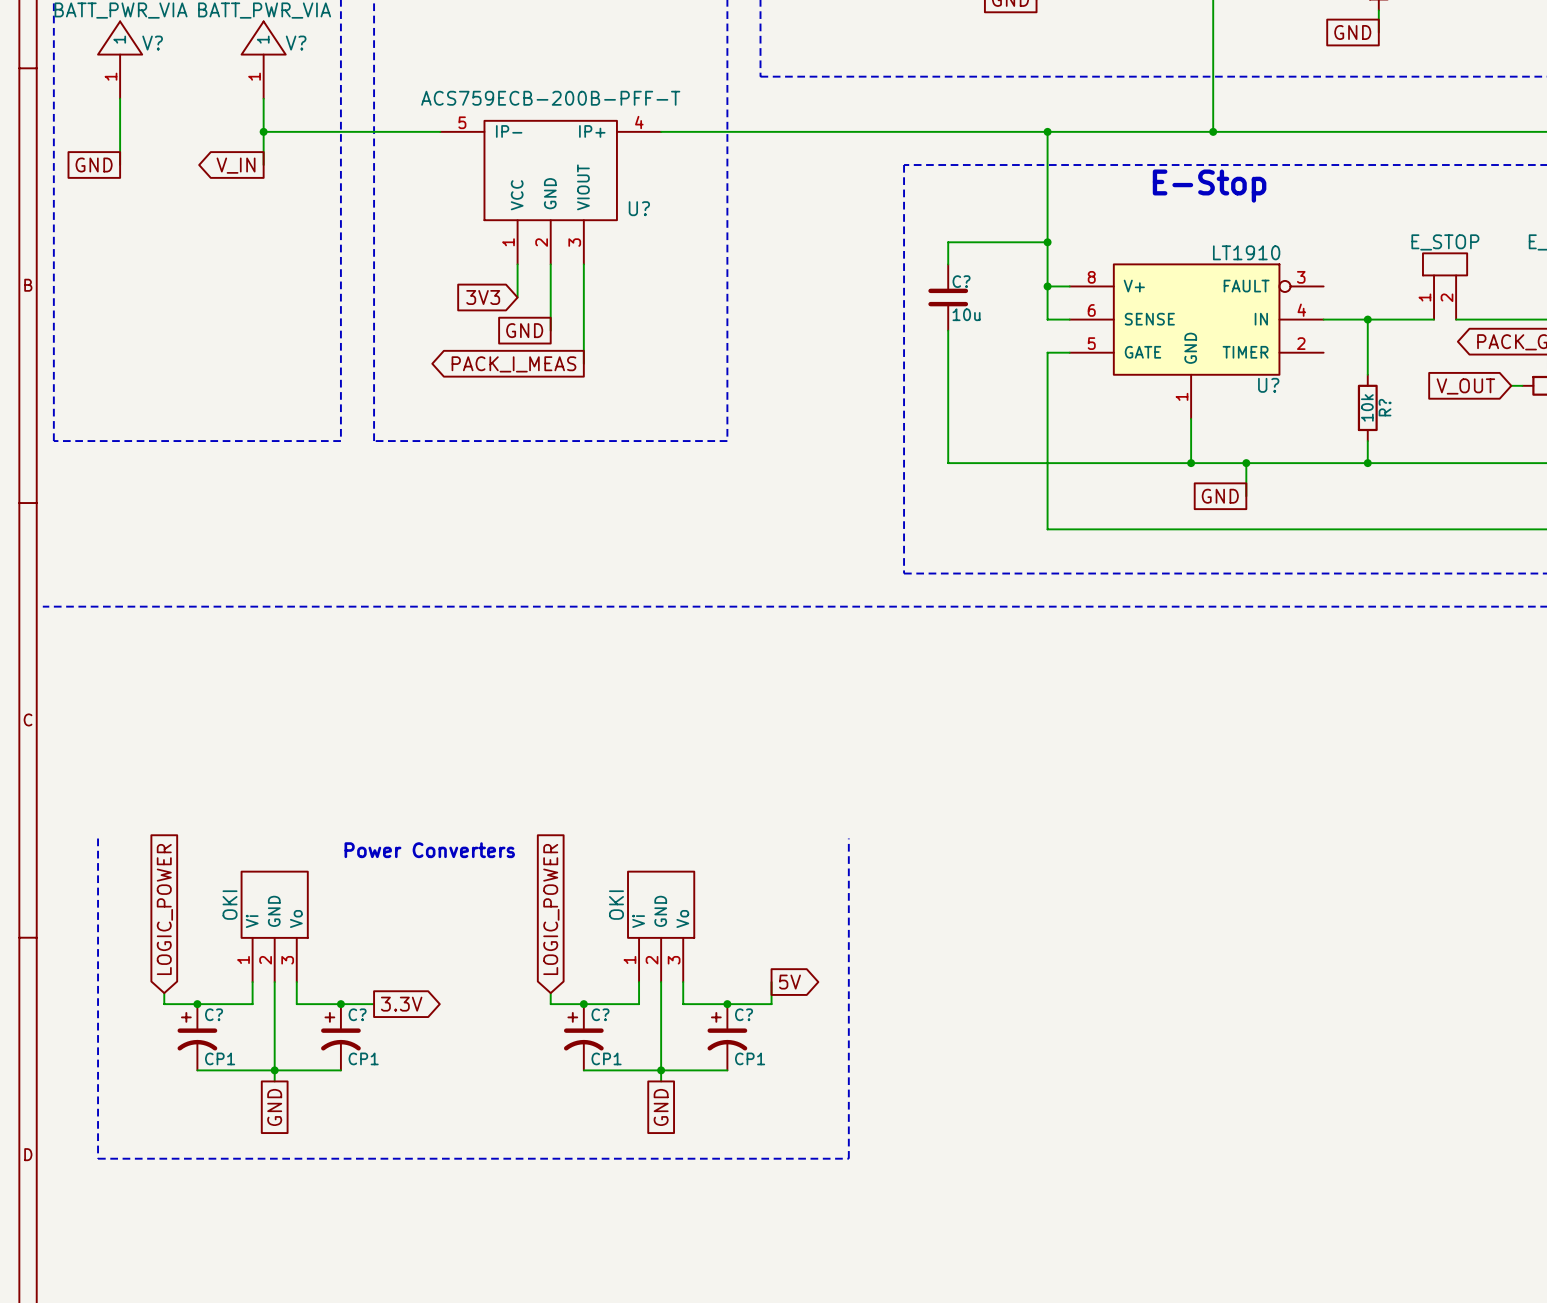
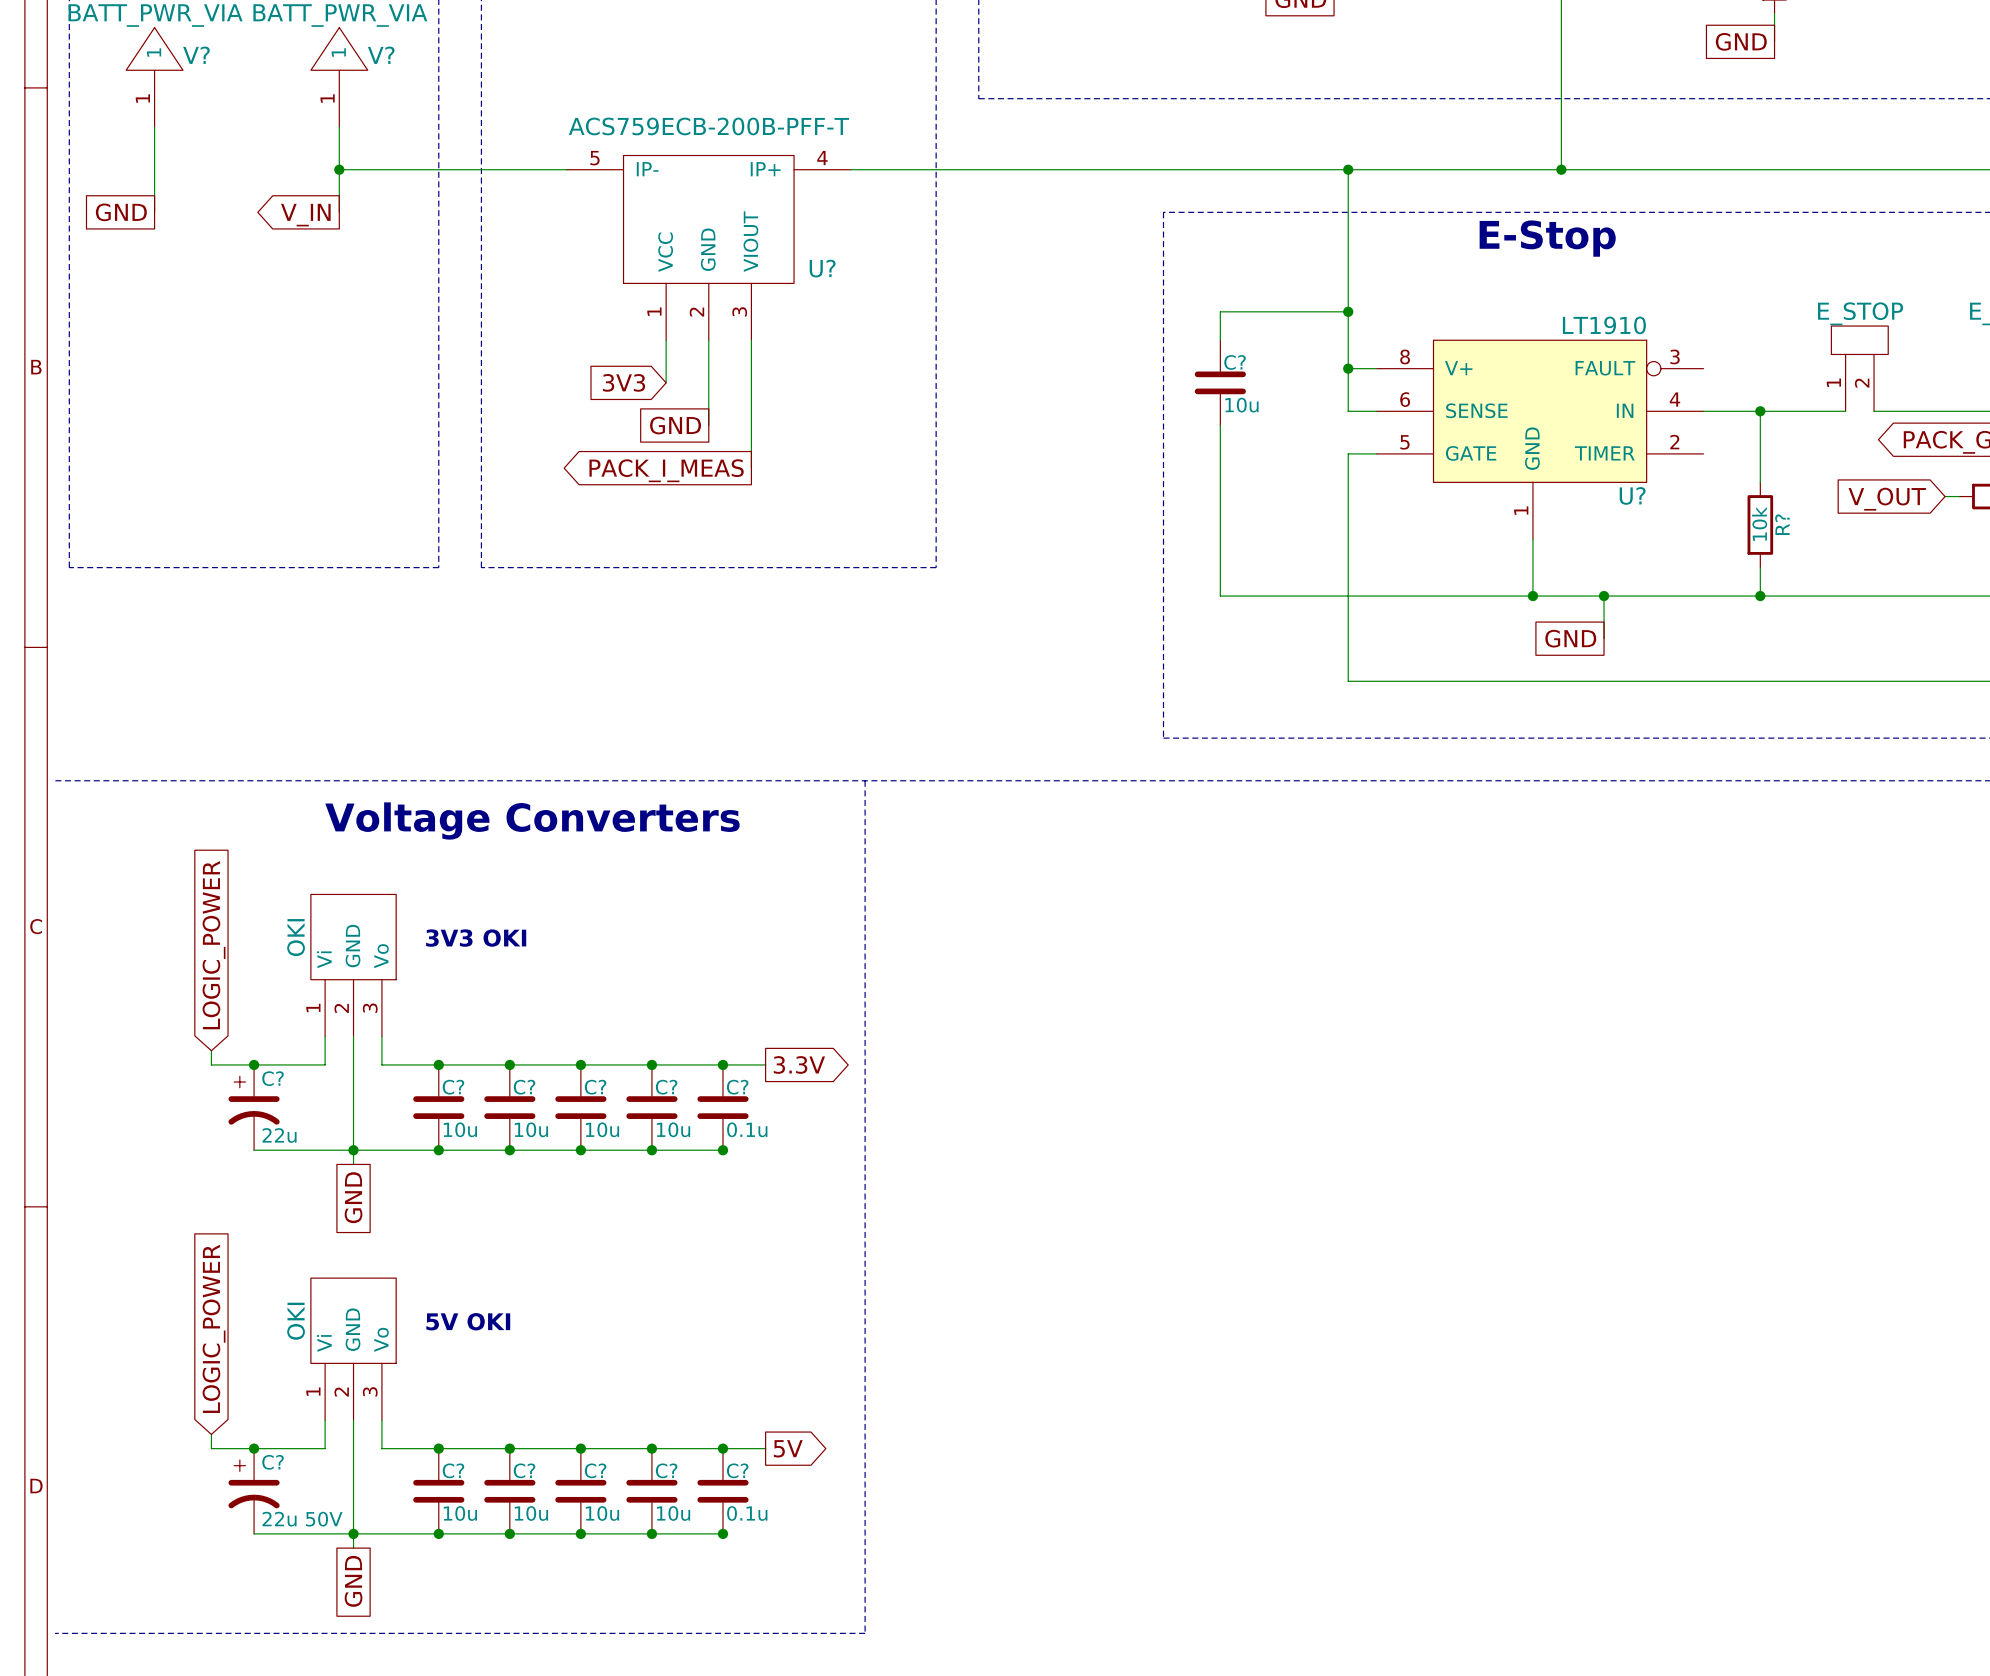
line: none -> (865, 780) (865, 1633) (55, 1633)
text: none -> Voltage Converters (532, 821)
text: none -> 3V3 OKI (476, 938)
global label: none -> LOGIC_POWER (214, 945)
part: none -> OKI (353, 965)
wire: none -> (325, 1036) (325, 1064) (211, 1064) (211, 1050)
wire: none -> (353, 1036) (353, 1164)
wire: none -> (381, 1036) (381, 1064) (765, 1064)
junction: none -> (254, 1064)
junction: none -> (438, 1064)
junction: none -> (509, 1064)
junction: none -> (580, 1064)
junction: none -> (651, 1064)
junction: none -> (722, 1064)
global label: none -> 3.3V (799, 1064)
line: (98, 838) (98, 1158) (848, 1158) (848, 838) -> none
text: Power Converters (429, 850) -> none
C?: none -> 22u (254, 1107)
C?: none -> 10u (438, 1107)
C?: none -> 10u (509, 1107)
C?: none -> 10u (580, 1107)
C?: none -> 10u (651, 1107)
C?: none -> 0.1u (722, 1107)
wire: none -> (254, 1150) (722, 1150)
junction: none -> (353, 1150)
junction: none -> (438, 1150)
junction: none -> (509, 1150)
junction: none -> (580, 1150)
junction: none -> (651, 1150)
junction: none -> (722, 1150)
global label: LOGIC_POWER (164, 909) -> none
global label: LOGIC_POWER (551, 909) -> none
part: OKI (274, 926) -> none
part: OKI (661, 926) -> none
global label: none -> GND (353, 1197)
wire: (252, 982) (252, 1004) (164, 1004) (164, 993) -> (325, 1420) (325, 1448) (211, 1448) (211, 1434)
wire: (274, 982) (274, 1081) -> (353, 1420) (353, 1548)
wire: (296, 982) (296, 1004) (374, 1004) -> none
wire: (639, 982) (639, 1004) (550, 1004) (550, 993) -> none
wire: (661, 982) (661, 1081) -> none
wire: (683, 982) (683, 1004) (771, 1004) (771, 982) -> none
global label: 5V (790, 982) -> none
junction: (197, 1004) -> none
junction: (340, 1004) -> none
global label: 3.3V (401, 1004) -> none
junction: (583, 1004) -> none
junction: (727, 1004) -> none
text: none -> 5V OKI (468, 1321)
global label: none -> LOGIC_POWER (214, 1328)
C?: CP1 (197, 1037) -> none
C?: CP1 (340, 1037) -> none
C?: CP1 (583, 1037) -> none
C?: CP1 (727, 1037) -> none
part: none -> OKI (353, 1349)
wire: (197, 1070) (340, 1070) -> none
junction: (274, 1070) -> none
wire: (583, 1070) (727, 1070) -> none
junction: (661, 1070) -> none
wire: none -> (381, 1420) (381, 1448) (765, 1448)
global label: GND (274, 1107) -> none
global label: GND (661, 1107) -> none
junction: none -> (254, 1448)
junction: none -> (438, 1448)
junction: none -> (509, 1448)
junction: none -> (580, 1448)
junction: none -> (651, 1448)
junction: none -> (722, 1448)
global label: none -> 5V (788, 1448)
C?: none -> 22u 50V (254, 1491)
C?: none -> 10u (438, 1491)
C?: none -> 10u (509, 1491)
C?: none -> 10u (580, 1491)
C?: none -> 10u (651, 1491)
C?: none -> 0.1u (722, 1491)
wire: none -> (254, 1533) (722, 1533)
junction: none -> (353, 1533)
junction: none -> (438, 1533)
junction: none -> (509, 1533)
junction: none -> (580, 1533)
junction: none -> (651, 1533)
junction: none -> (722, 1533)
global label: none -> GND (353, 1581)

